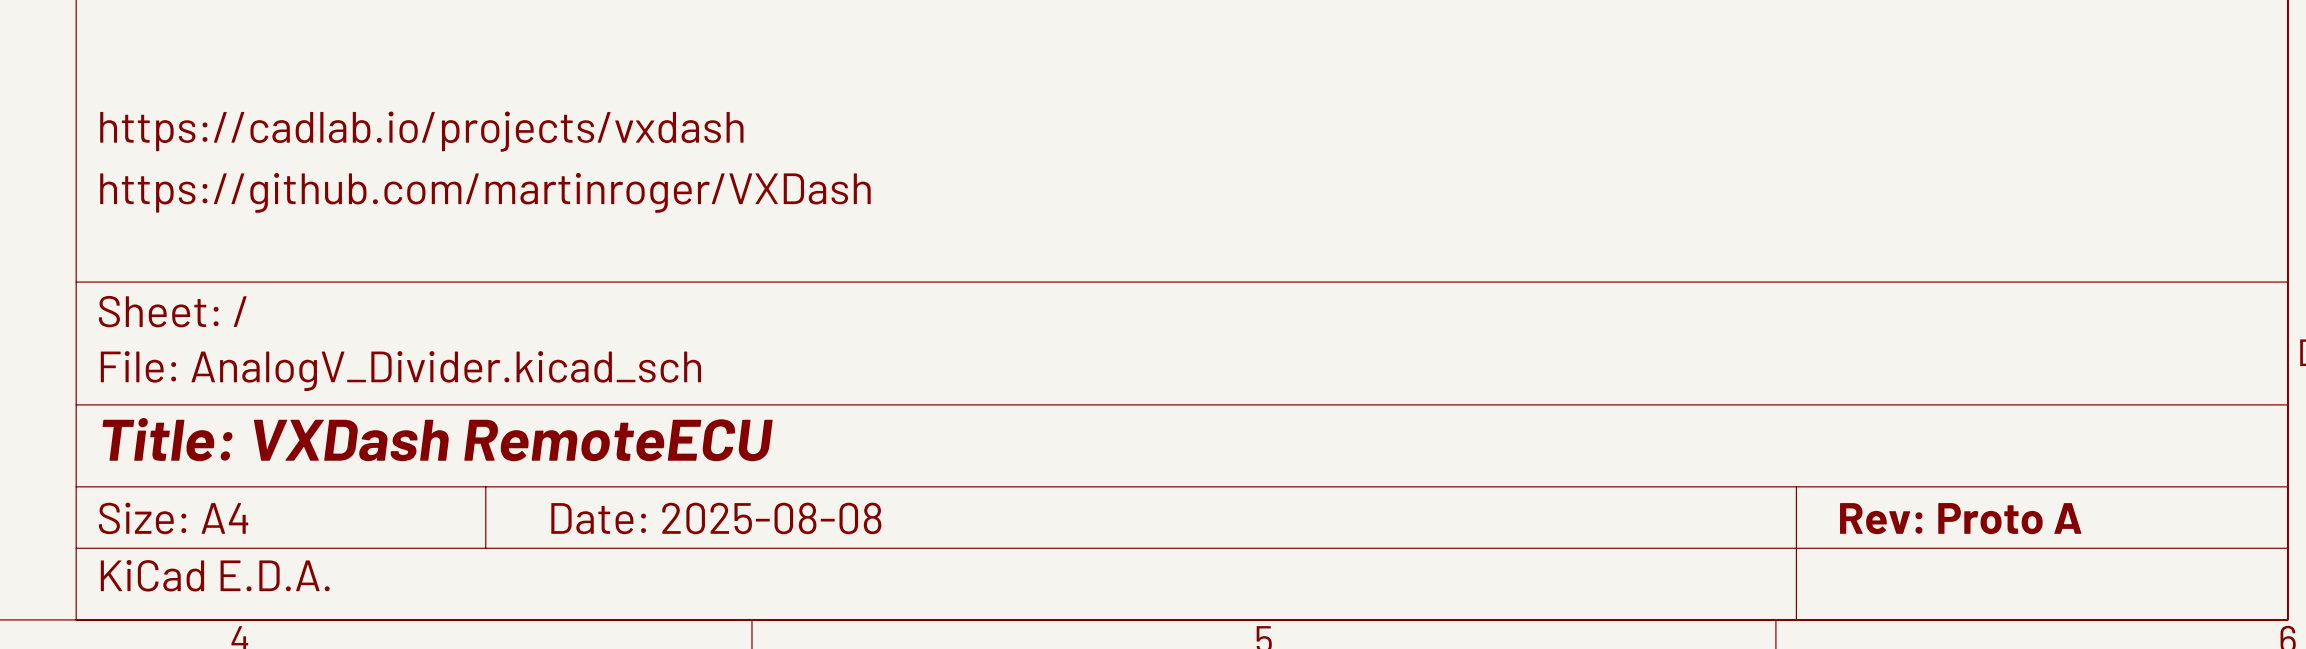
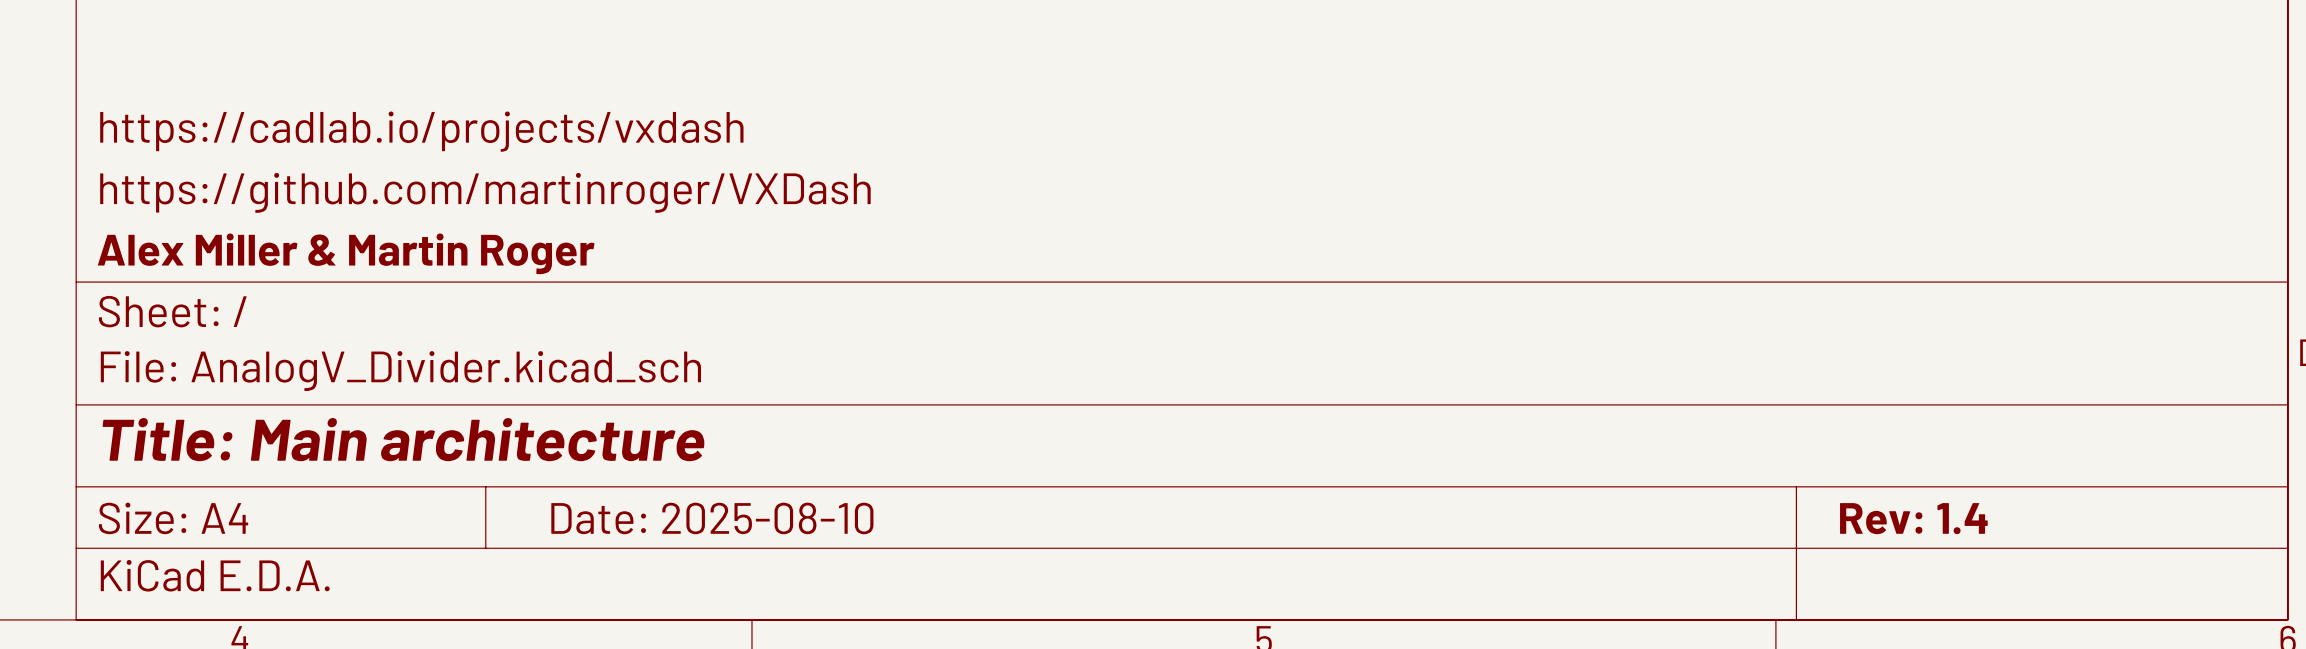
title block: none -> Alex Miller & Martin Roger (346, 253)
title block: Title: VXDash RemoteECU (437, 439) -> Title: Main architecture (403, 439)
title block: Date: 2025-08-08 (716, 518) -> Date: 2025-08-10 (712, 518)
title block: Rev: Proto A (1960, 518) -> Rev: 1.4 (1913, 518)

